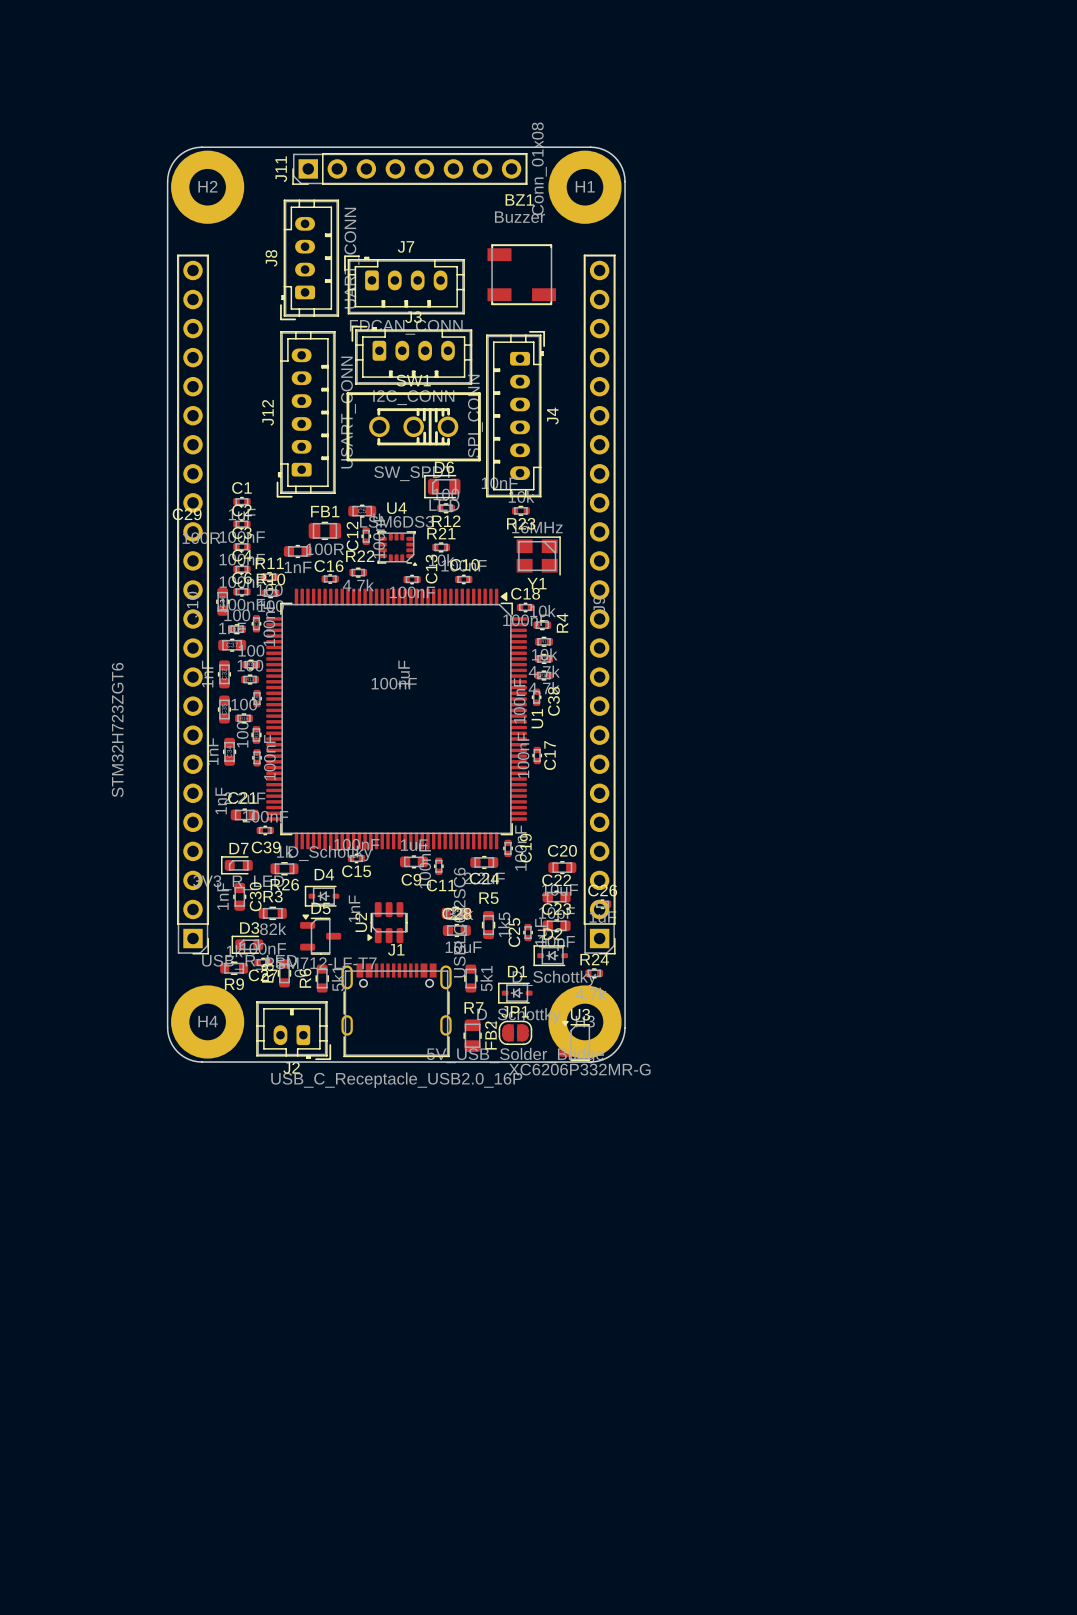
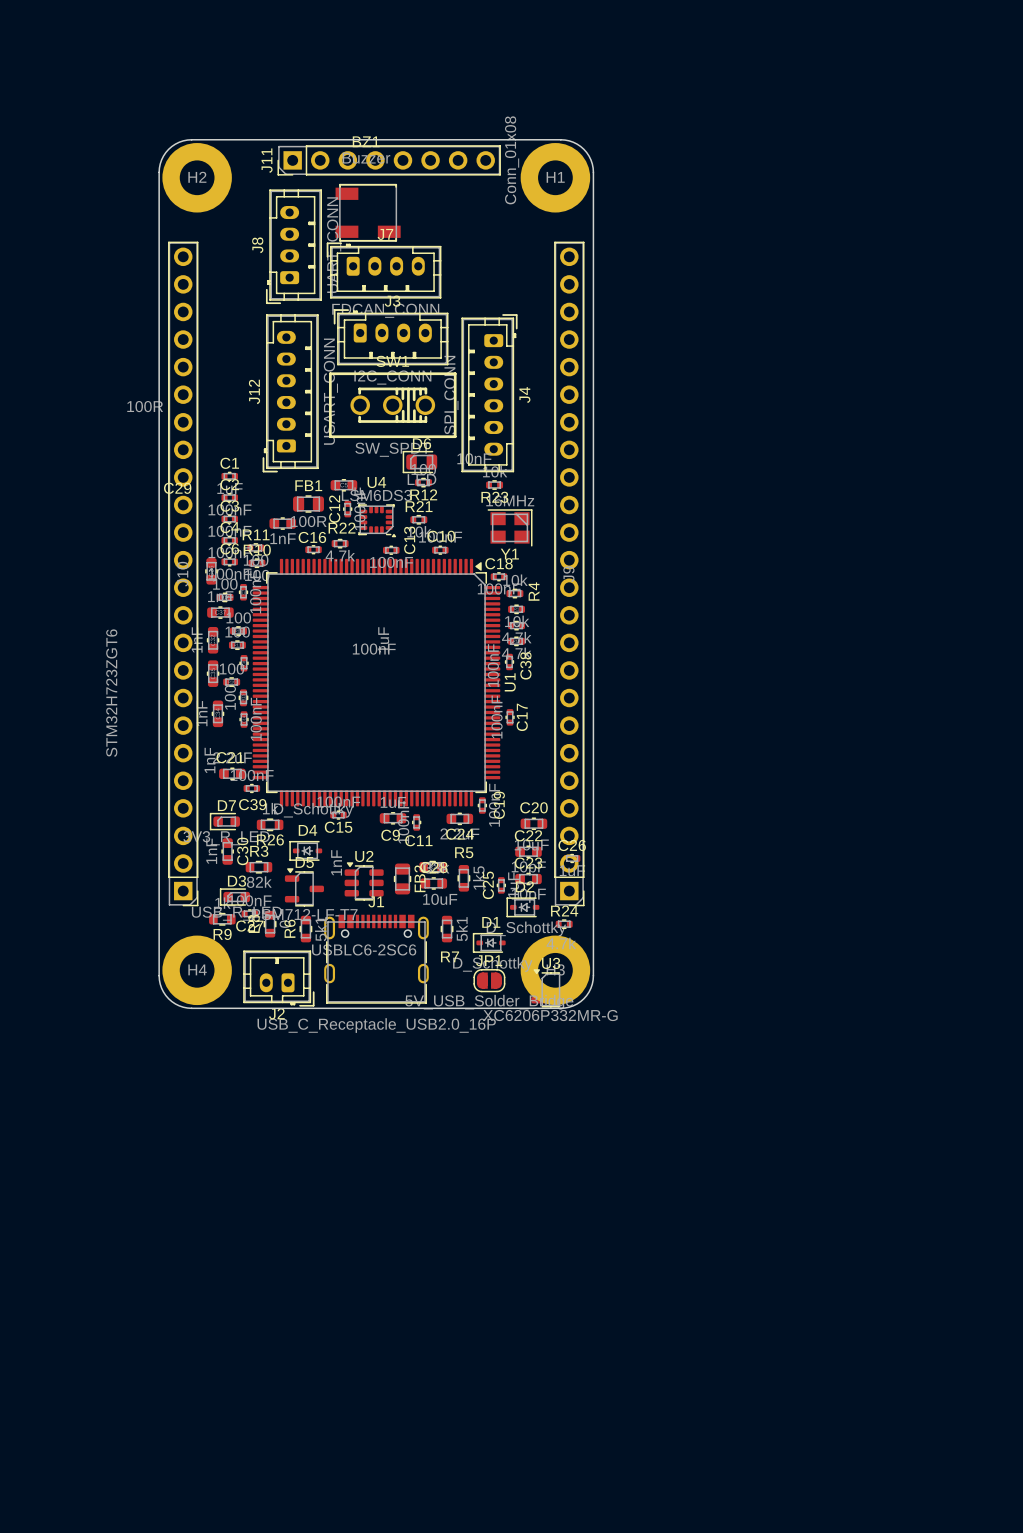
BZ1 position: (521, 274) -> (368, 212)
U2 rotation: 0° (387, 922) -> 90° clockwise (364, 881)
FB2 position: (472, 1035) -> (402, 878)

